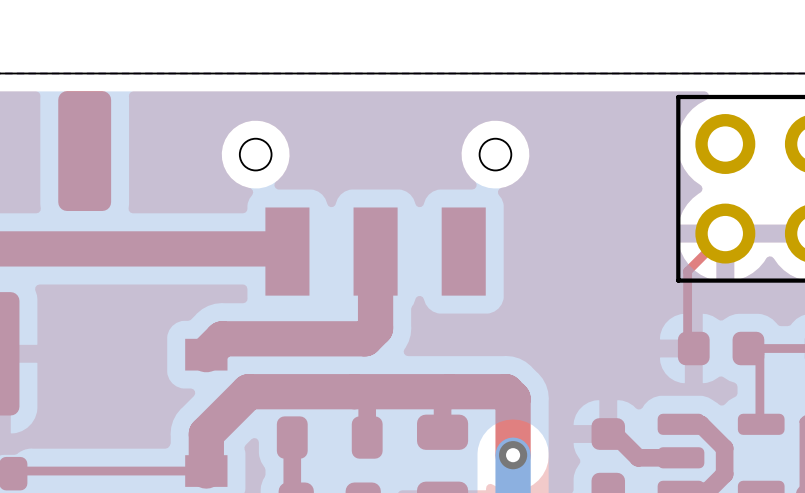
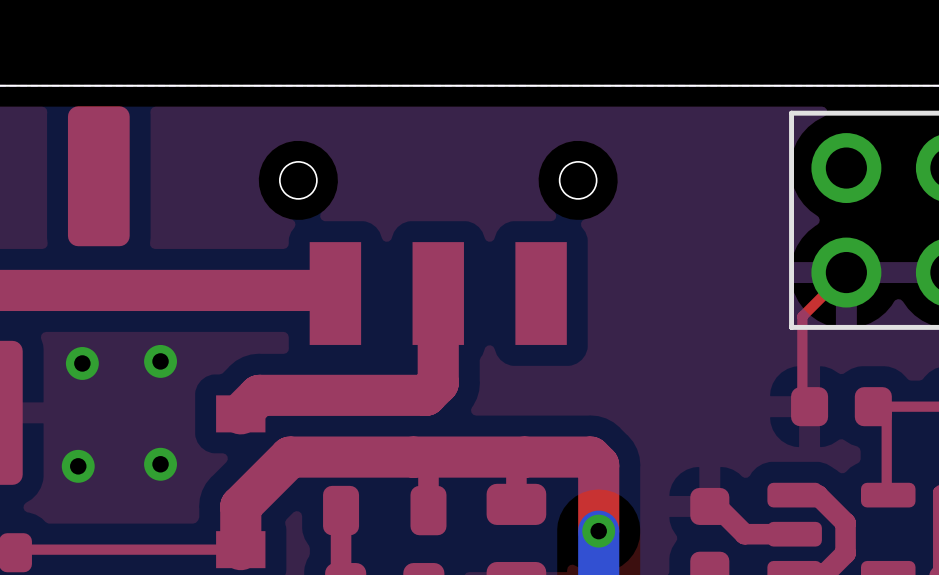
via: none -> (160, 361)
via: none -> (82, 363)
via: none -> (160, 464)
via: none -> (78, 466)

